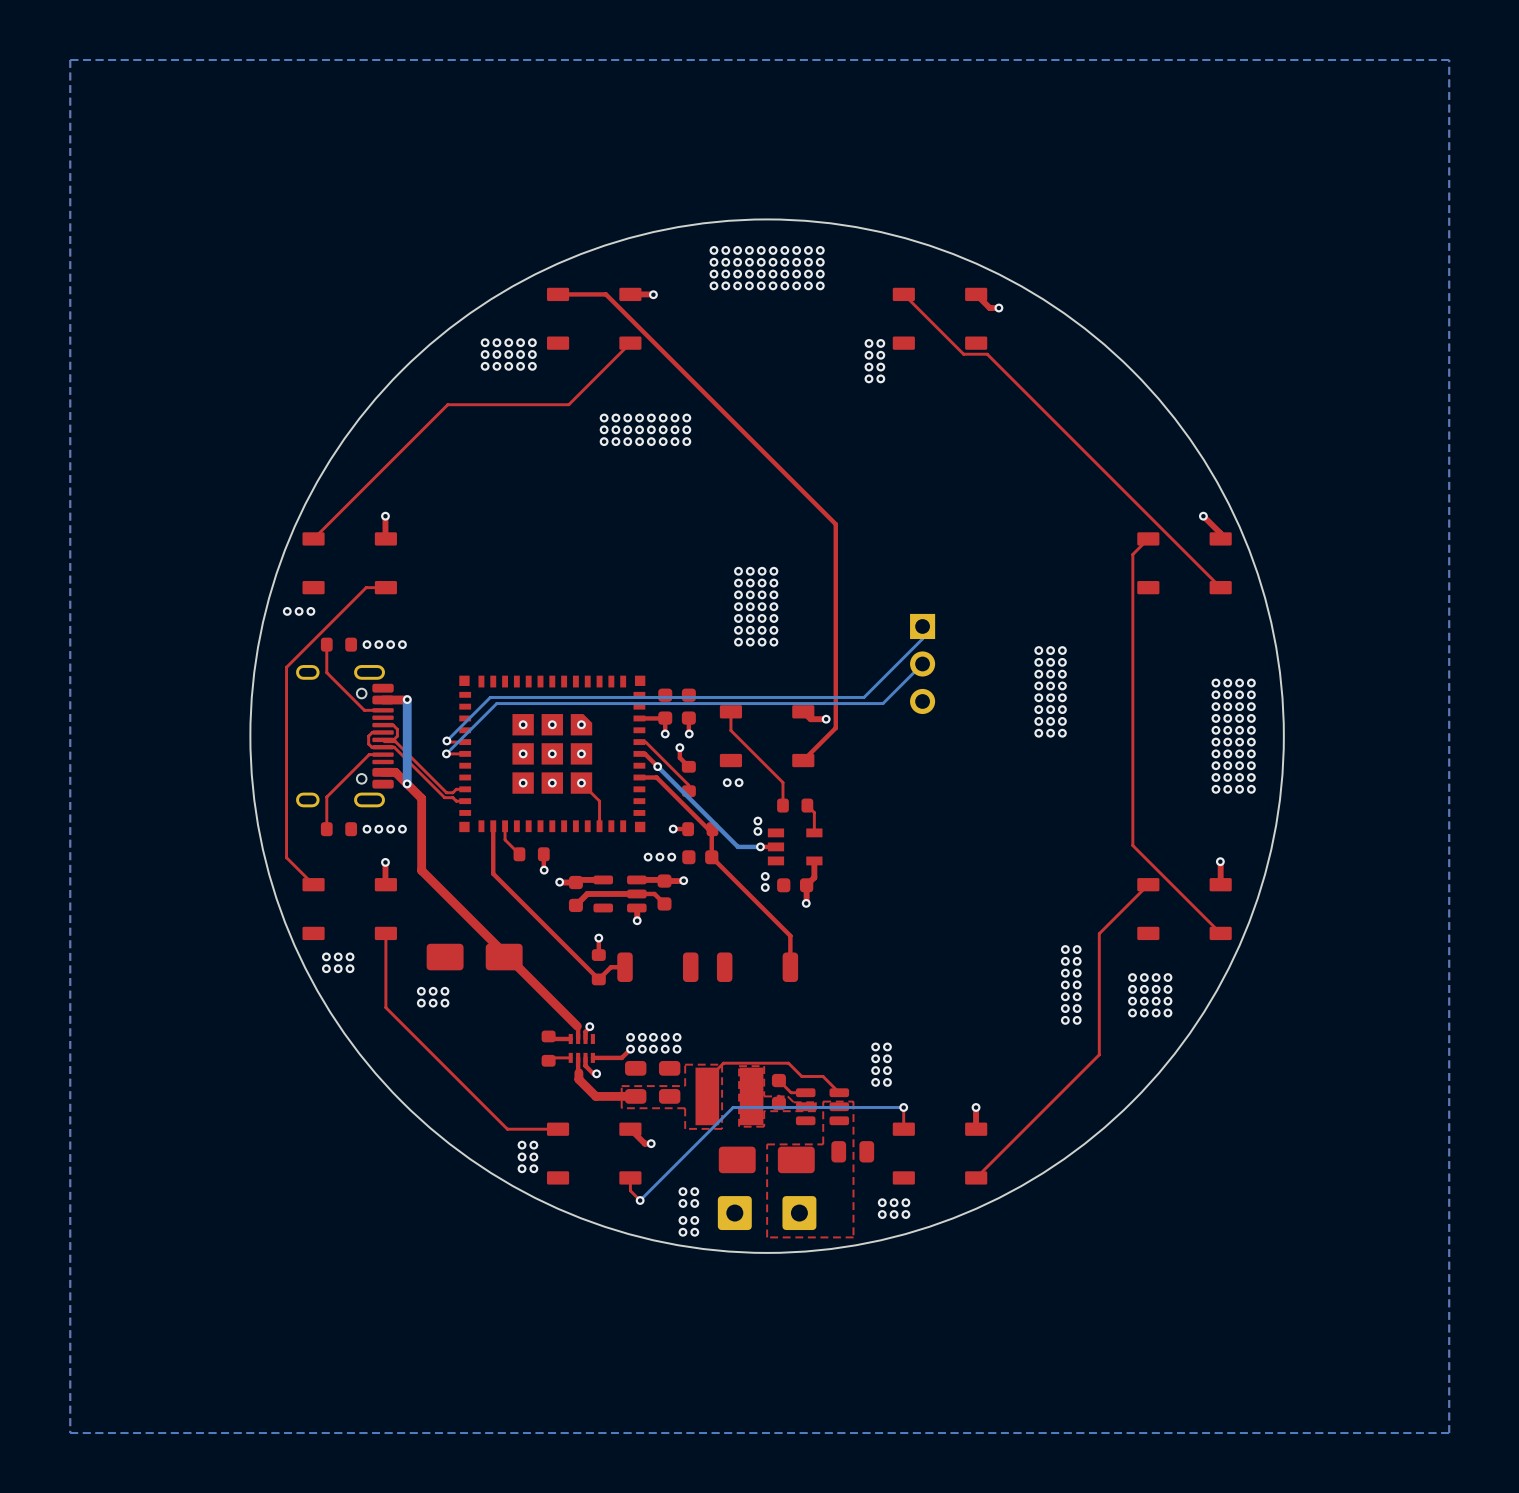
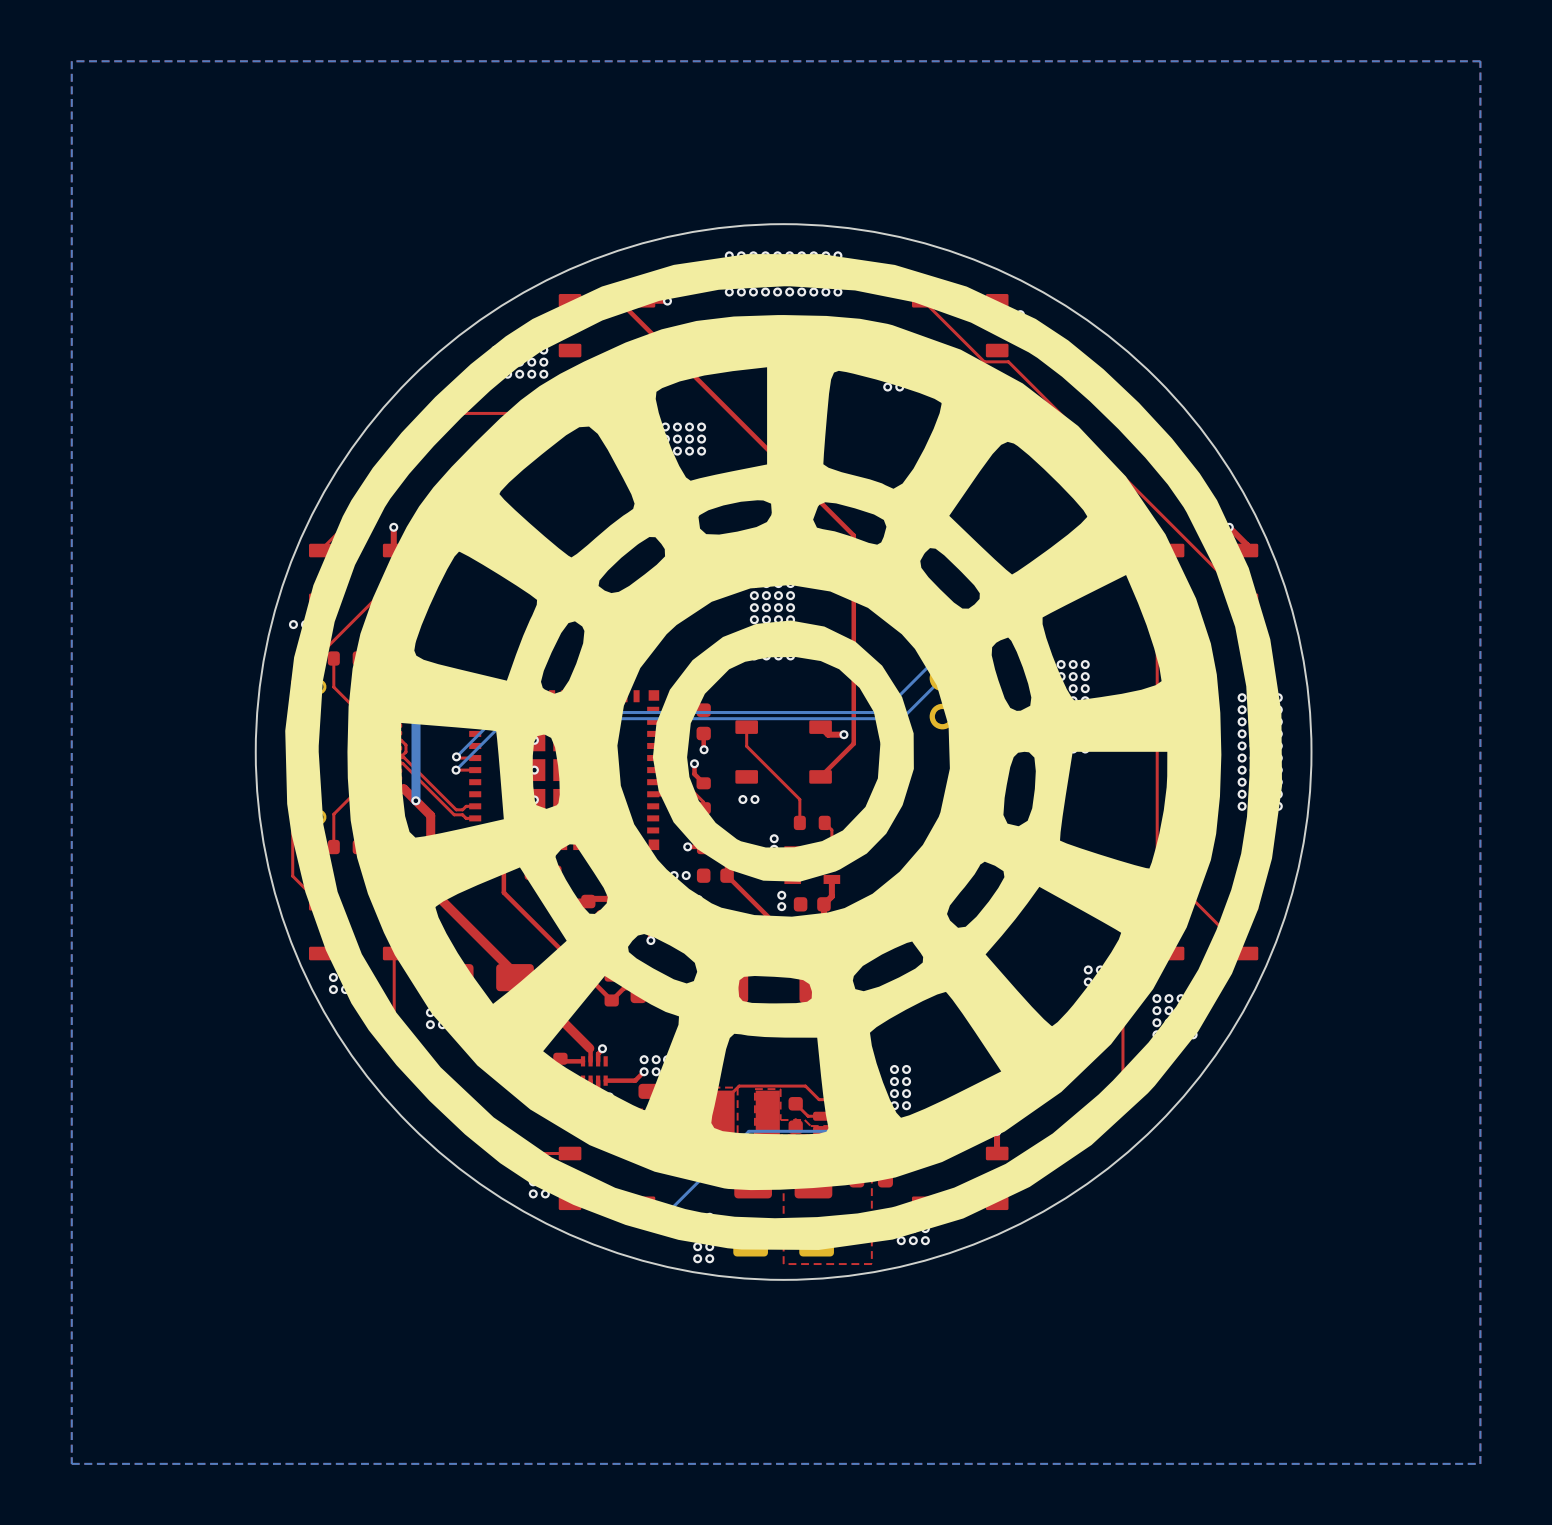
drawing: none -> [285, 254, 1283, 1250]

